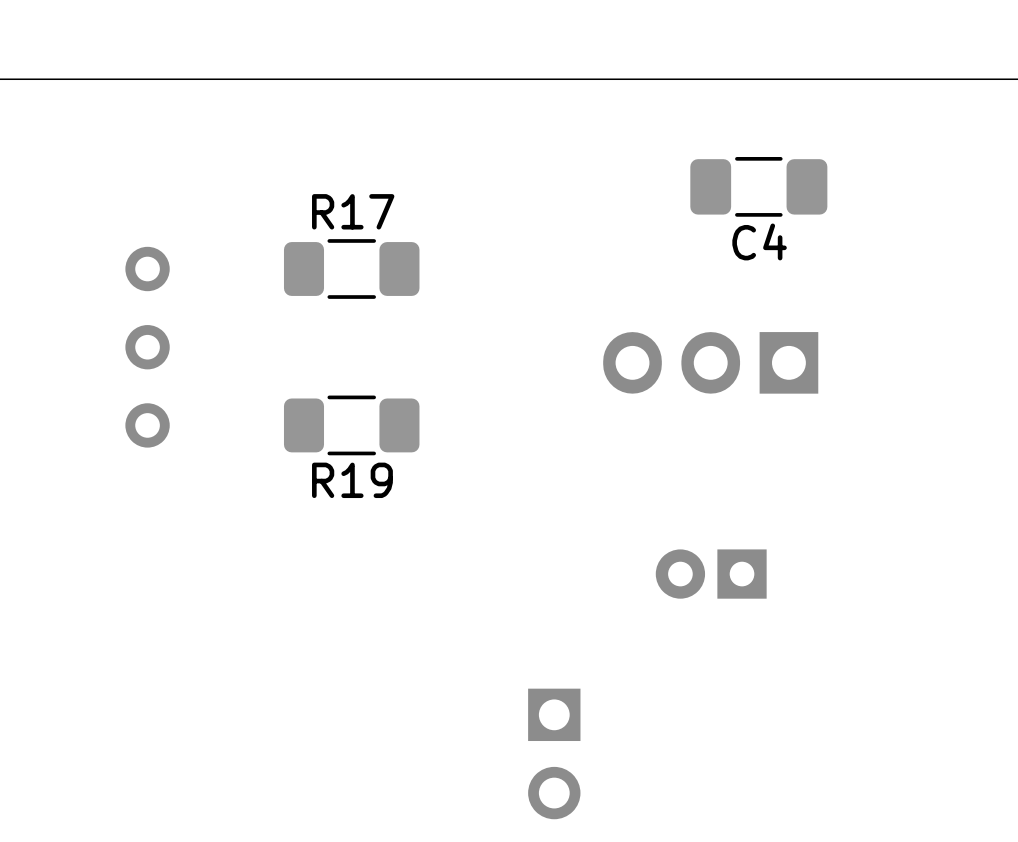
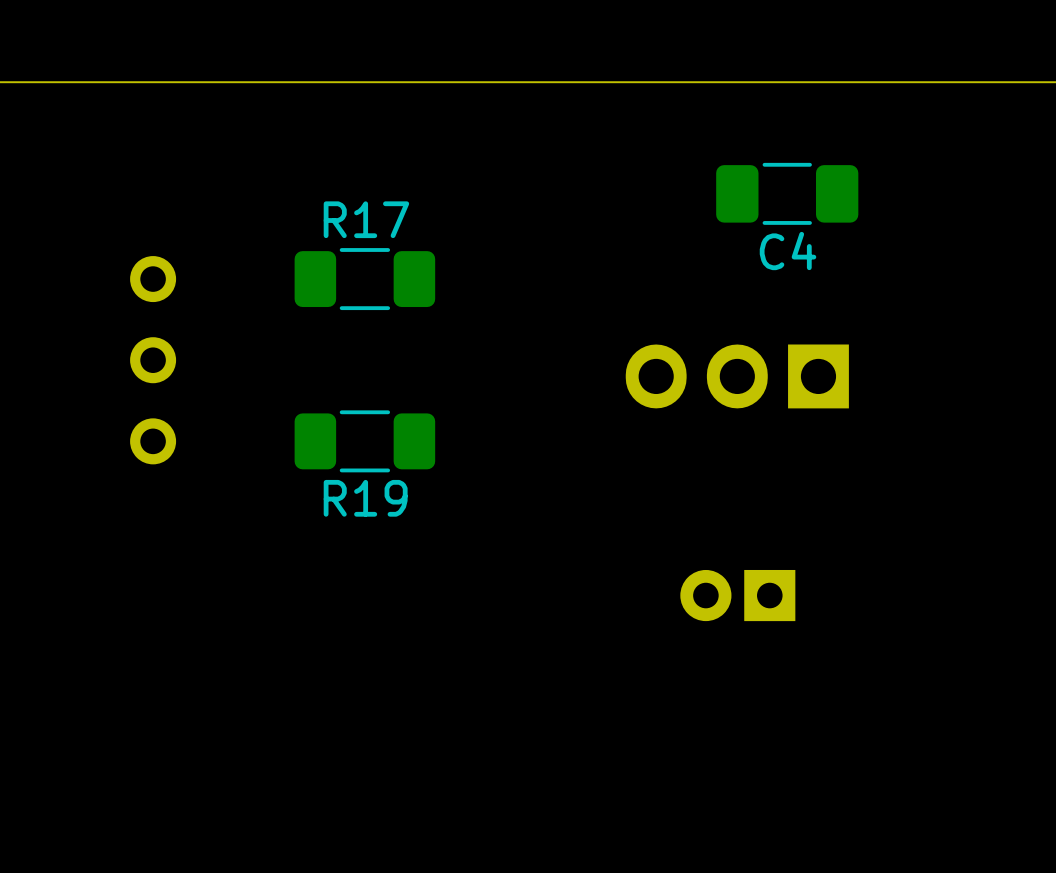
part: (554, 753) -> none

